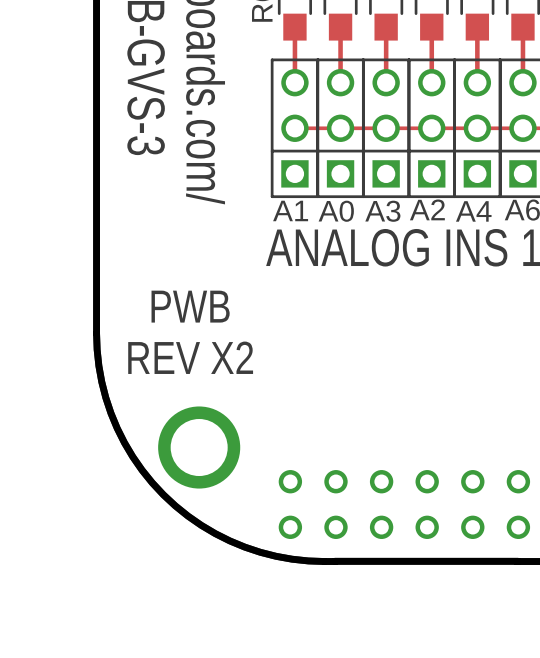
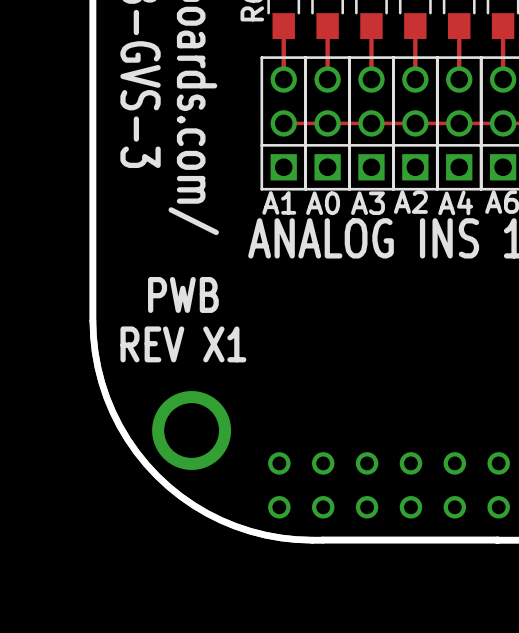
text: REV X2 (190, 357) -> REV X1 (183, 344)

